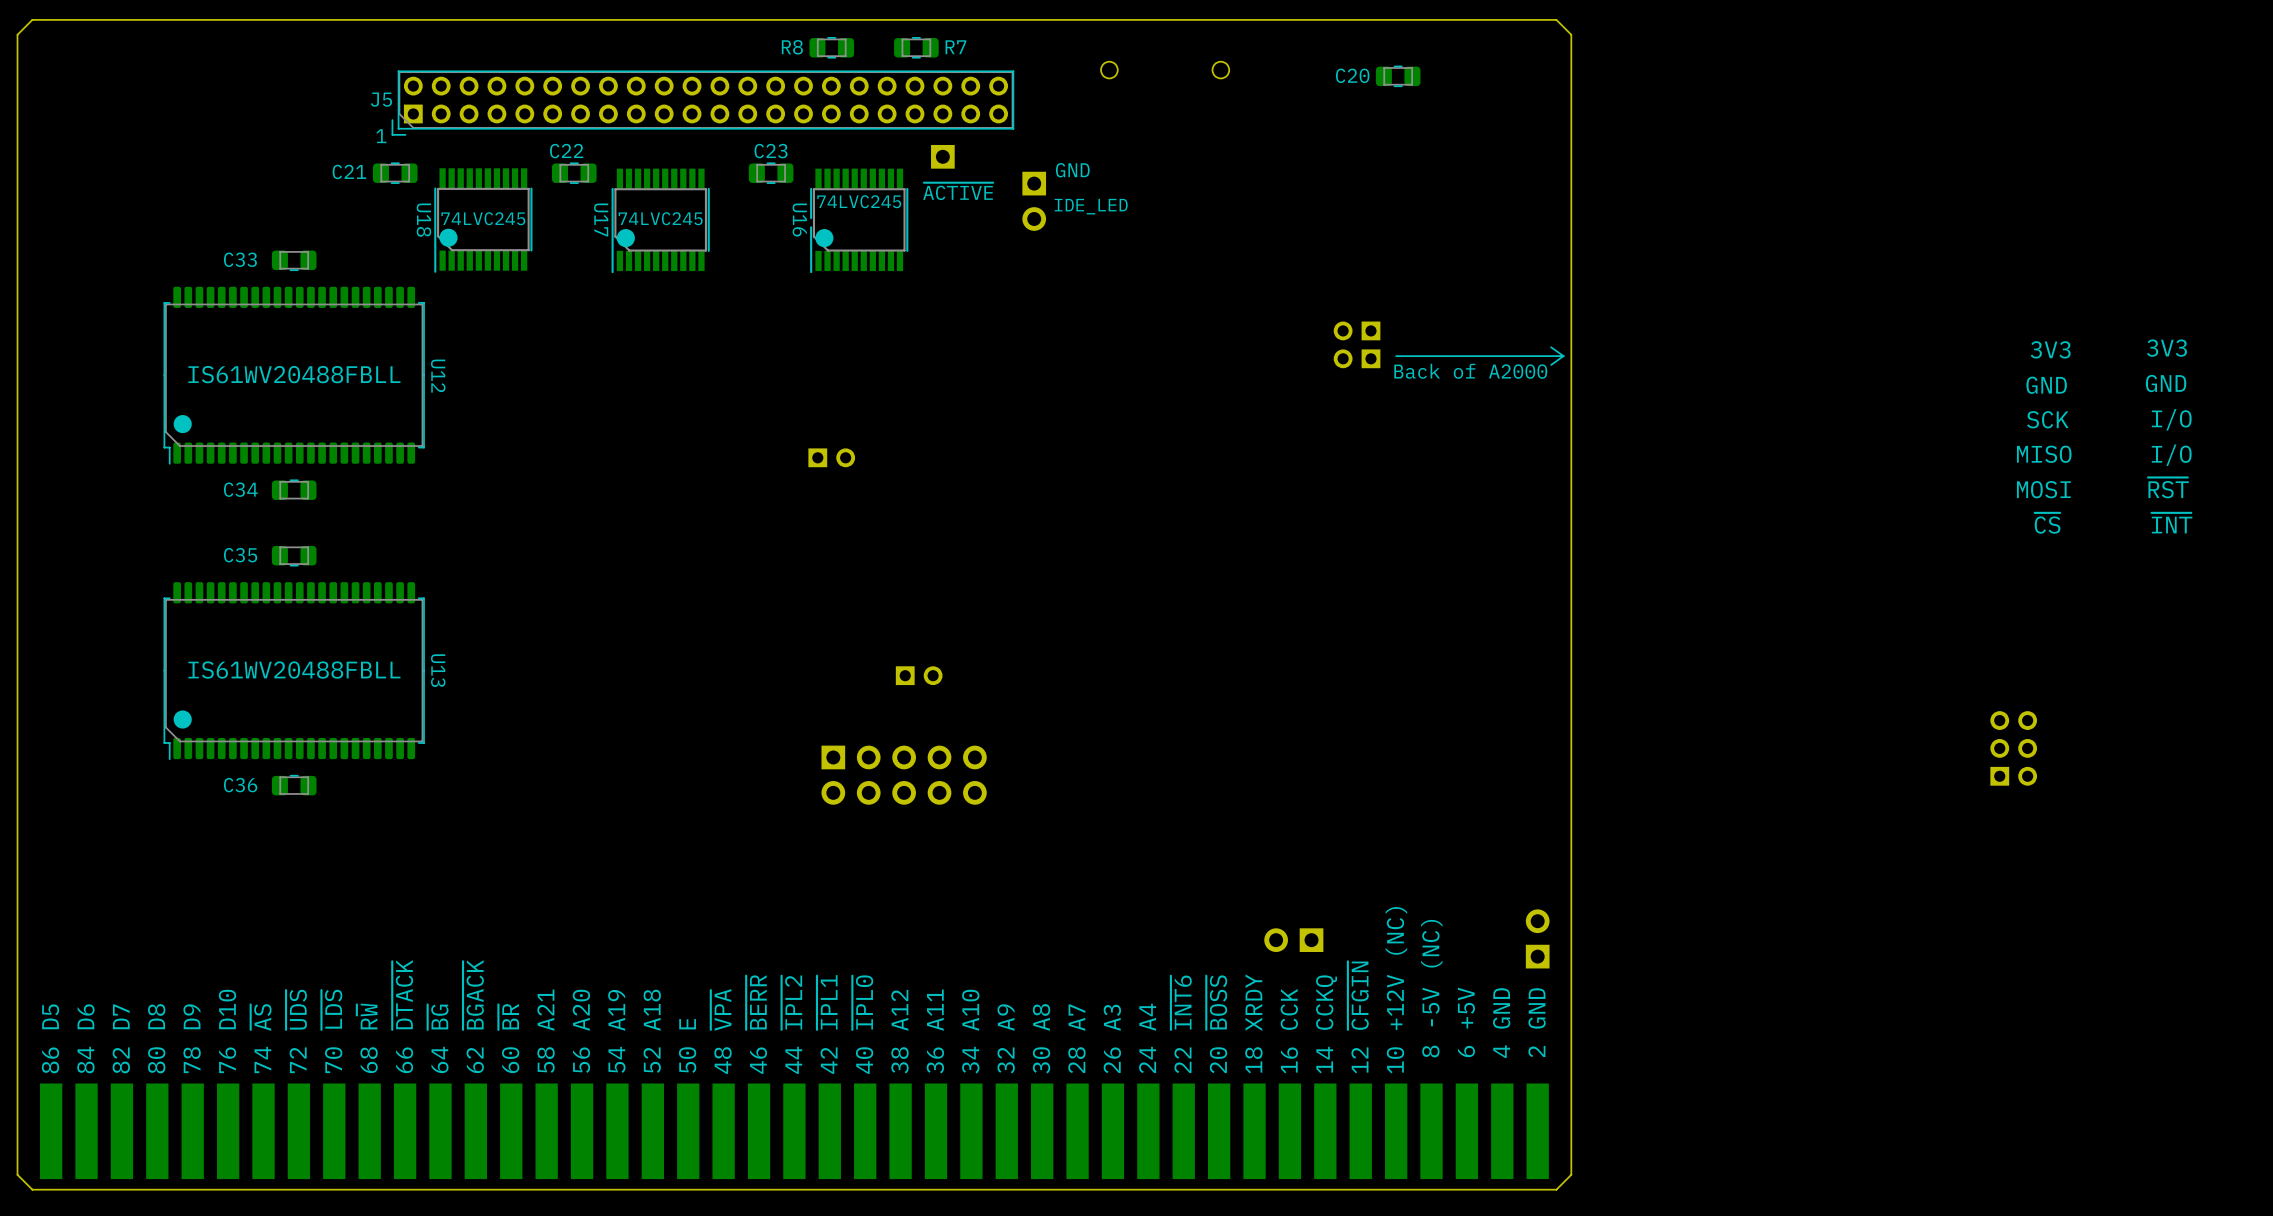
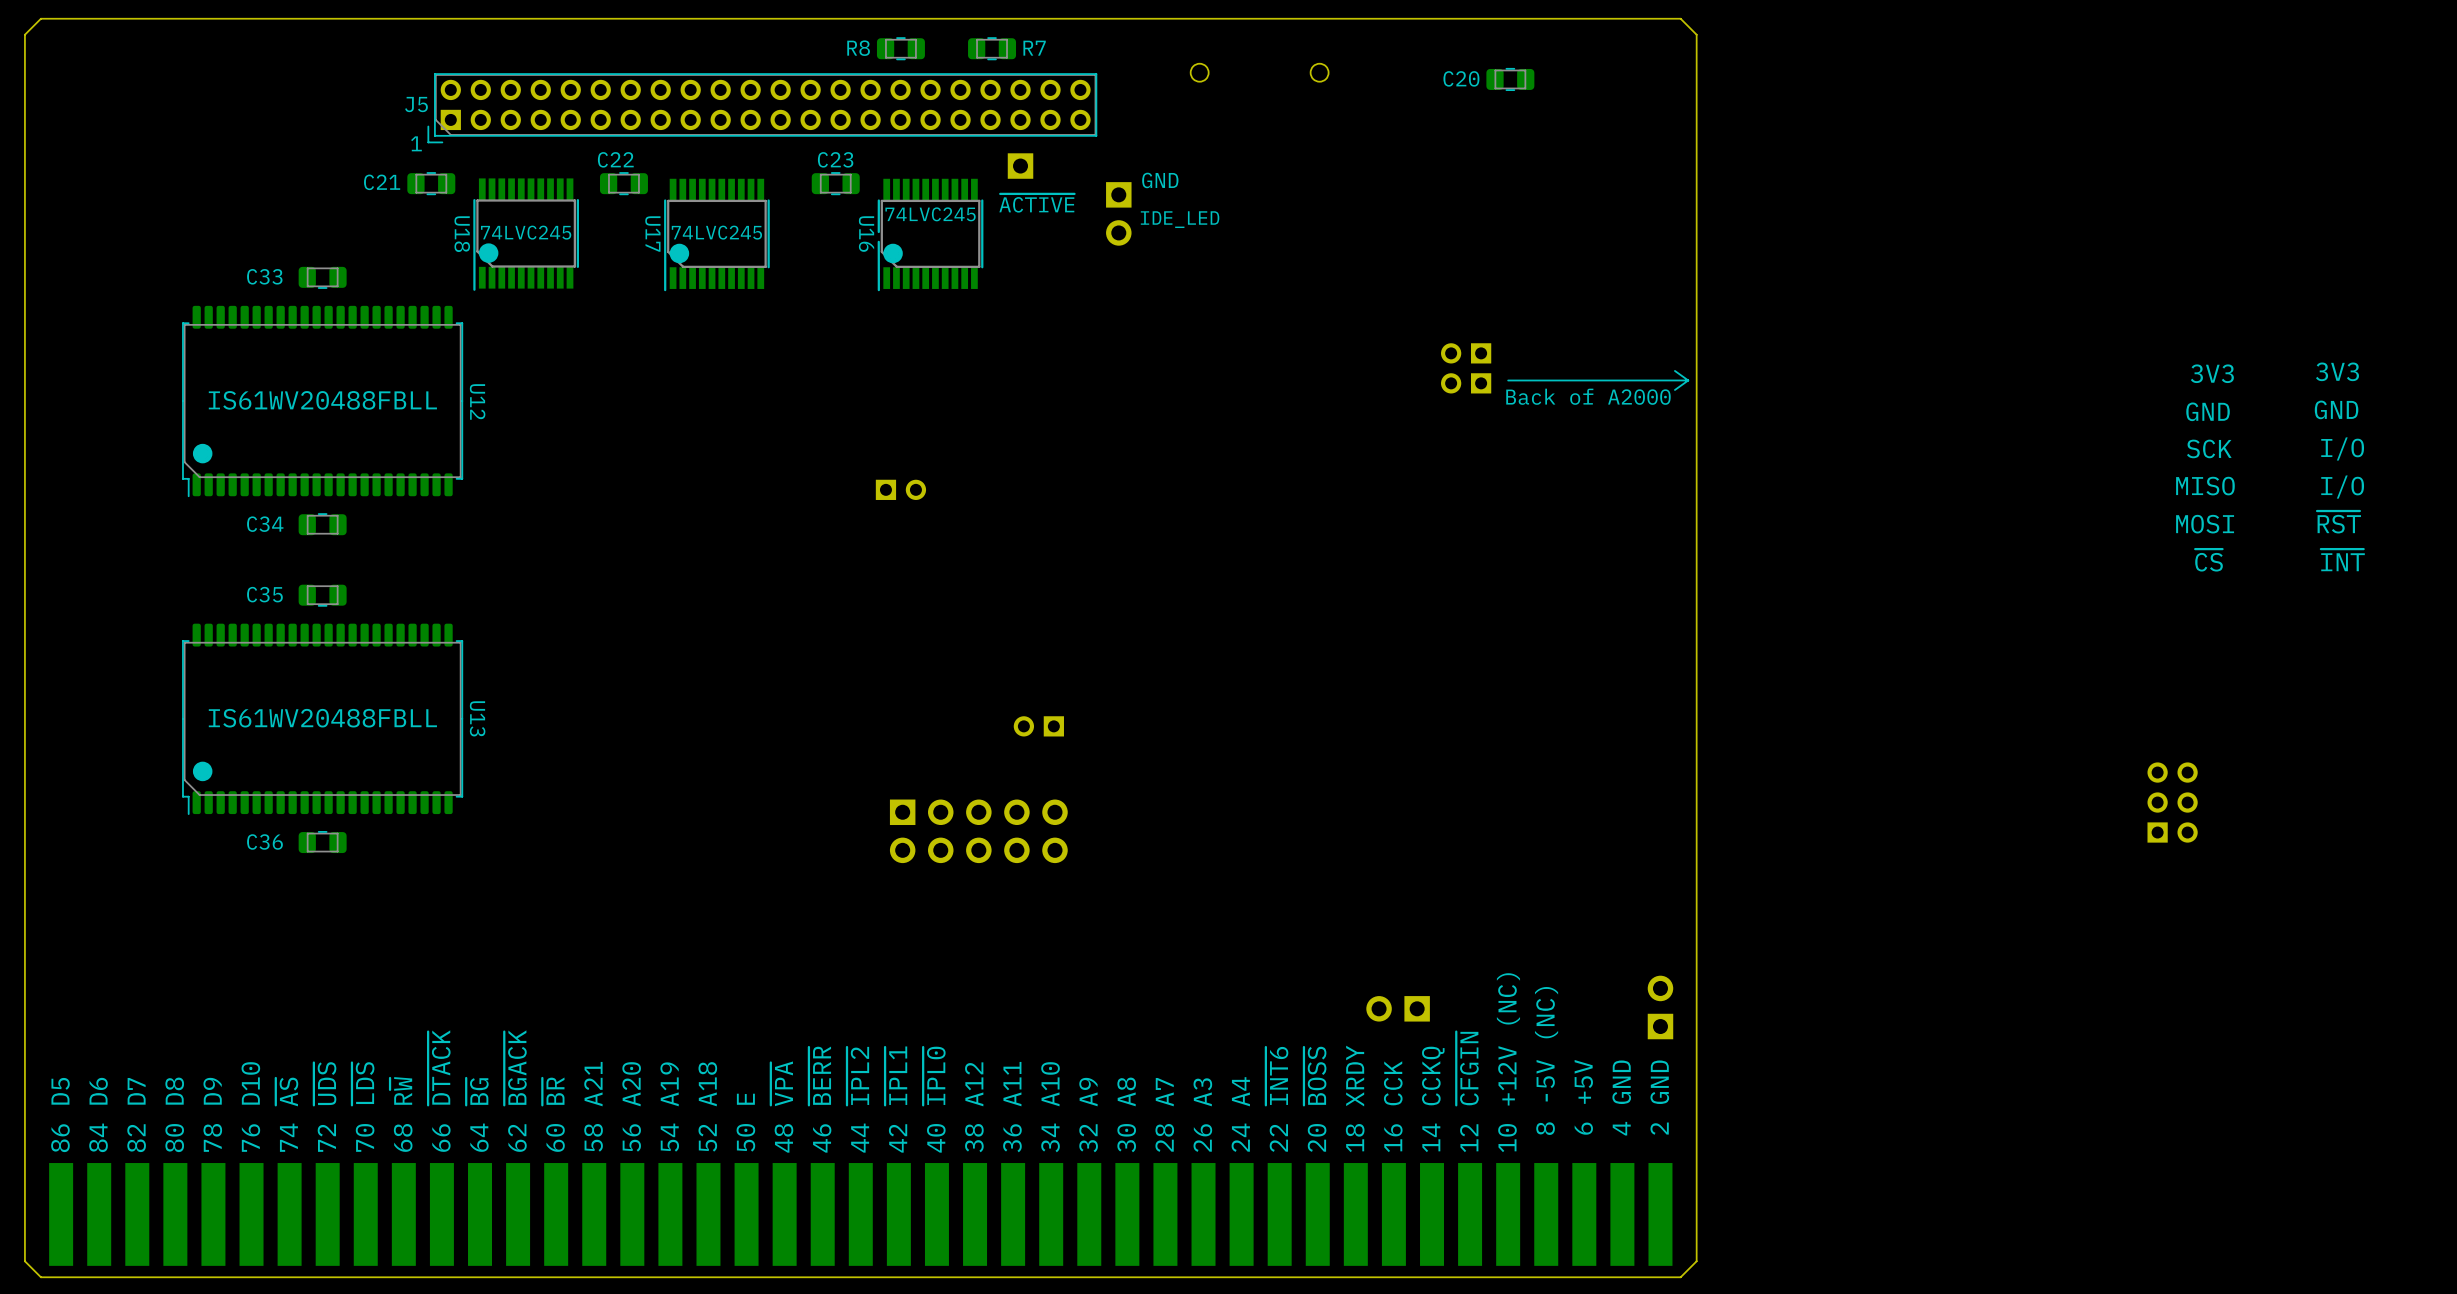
part rotation: 0° (919, 675) -> 180° (1038, 726)
part position: (919, 675) -> (1038, 726)

